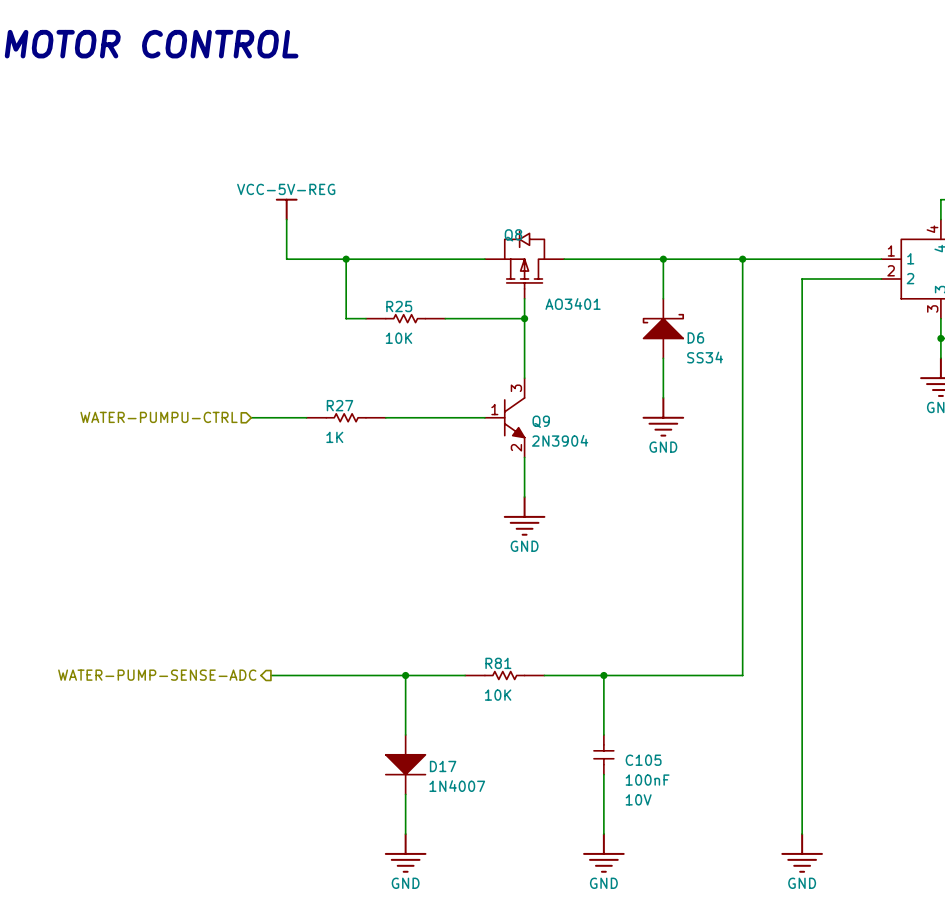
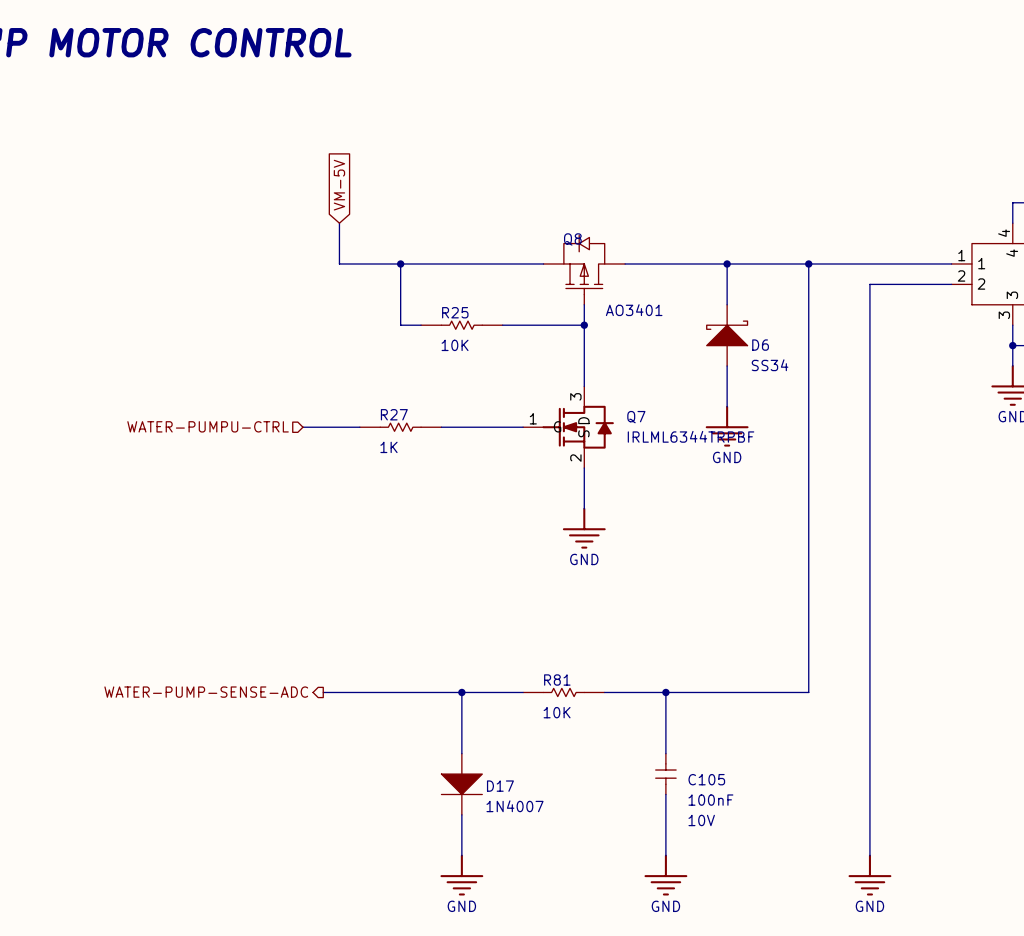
global label: none -> VM-5V (339, 185)
power symbol: VCC-5V-REG (286, 209) -> none
Q9: 2N3904 (504, 417) -> none
Q7: none -> IRLML6344TRPBF (568, 427)

